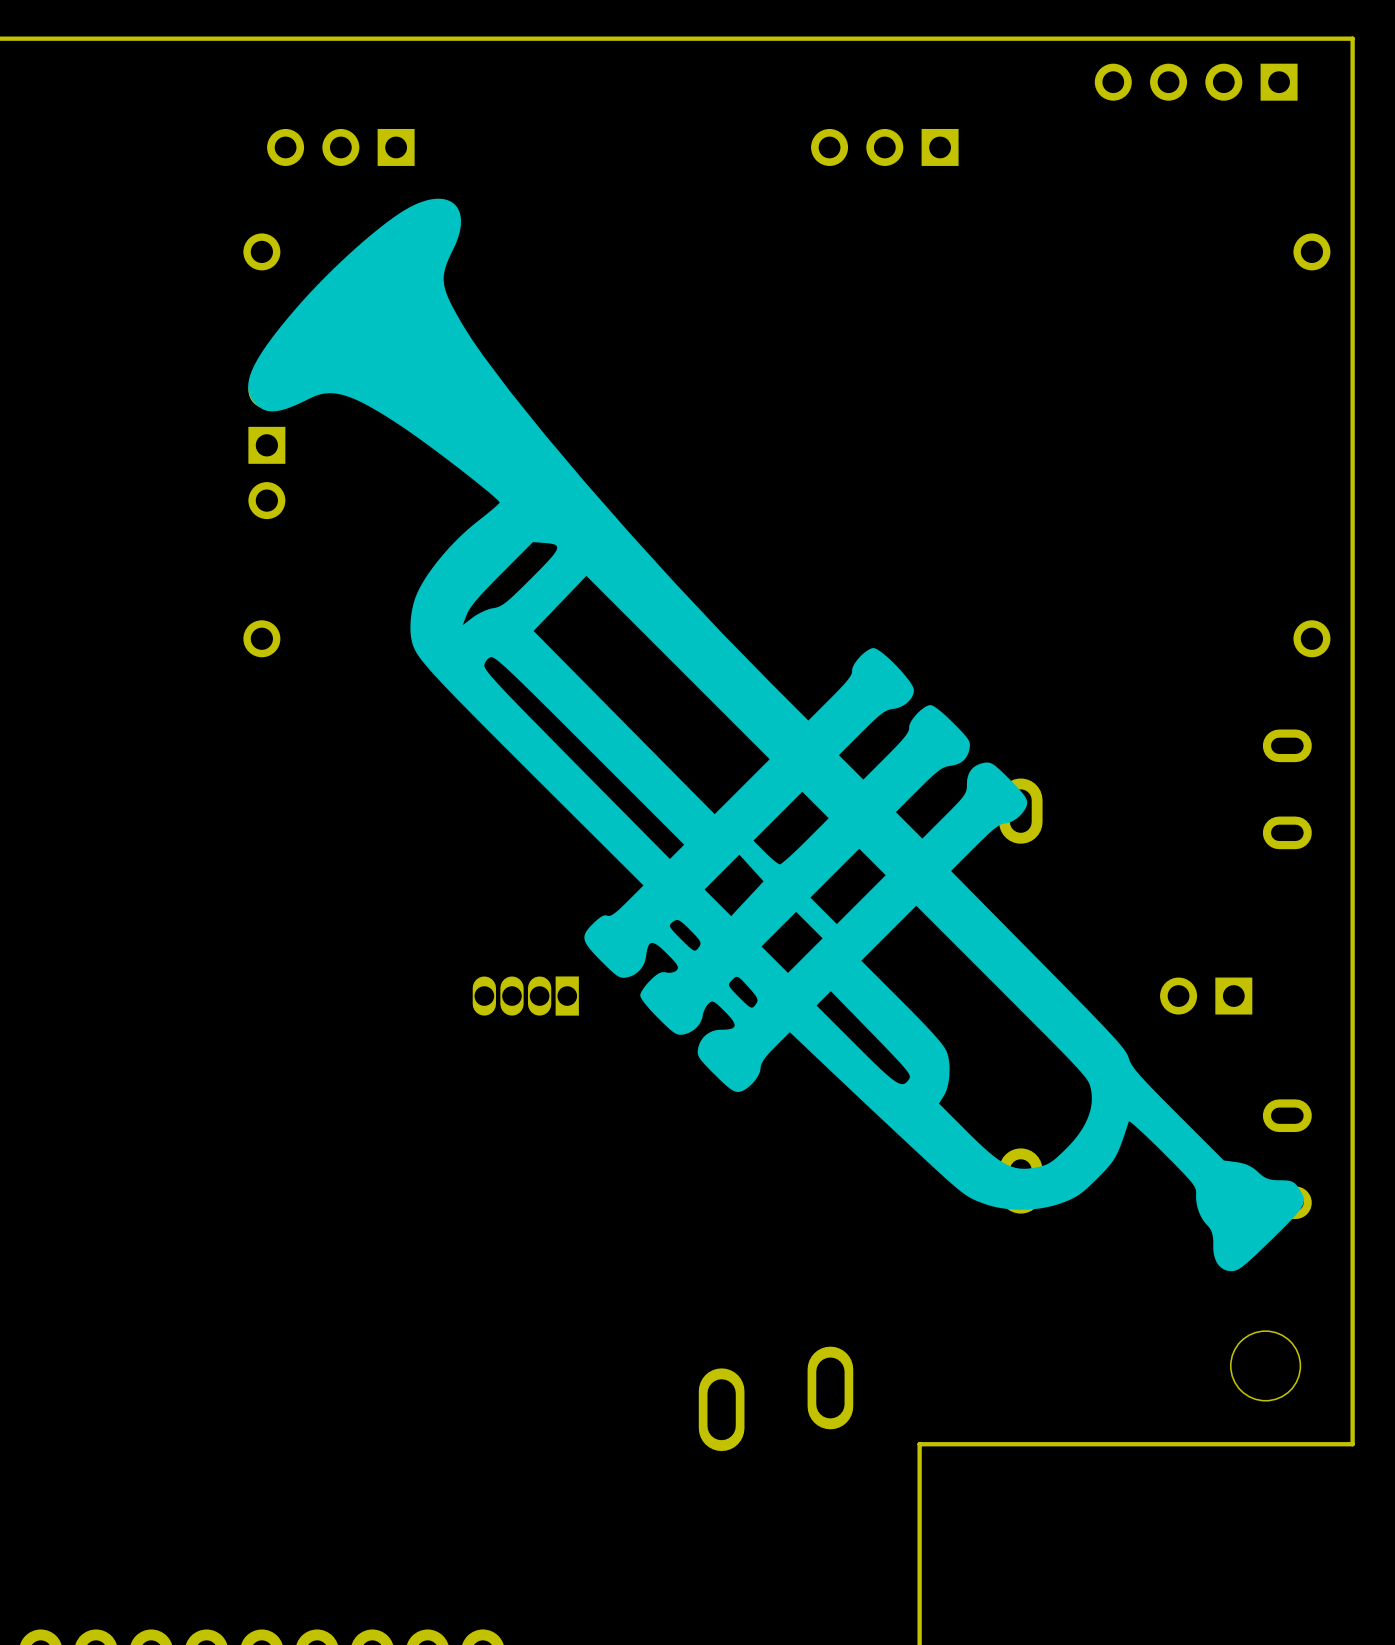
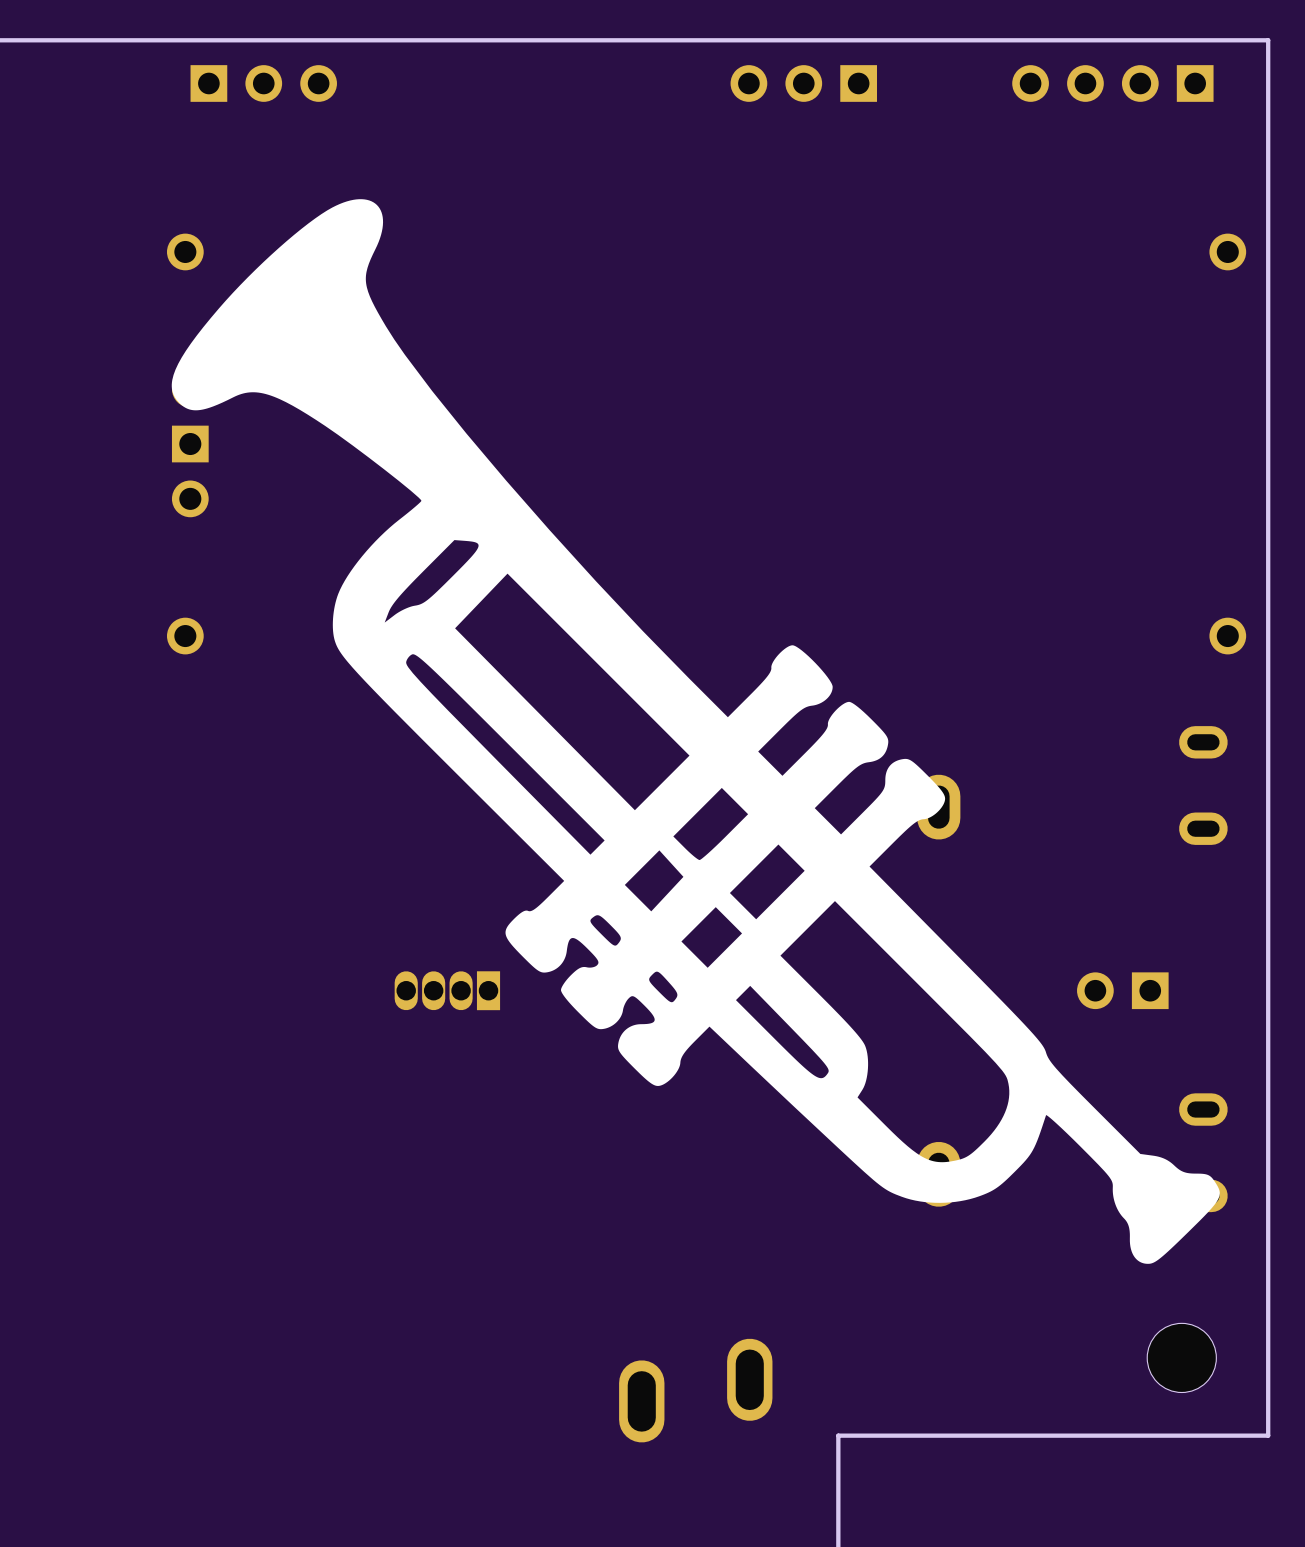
part rotation: 0° (340, 147) -> 180° (263, 83)
part position: (884, 147) -> (803, 83)

